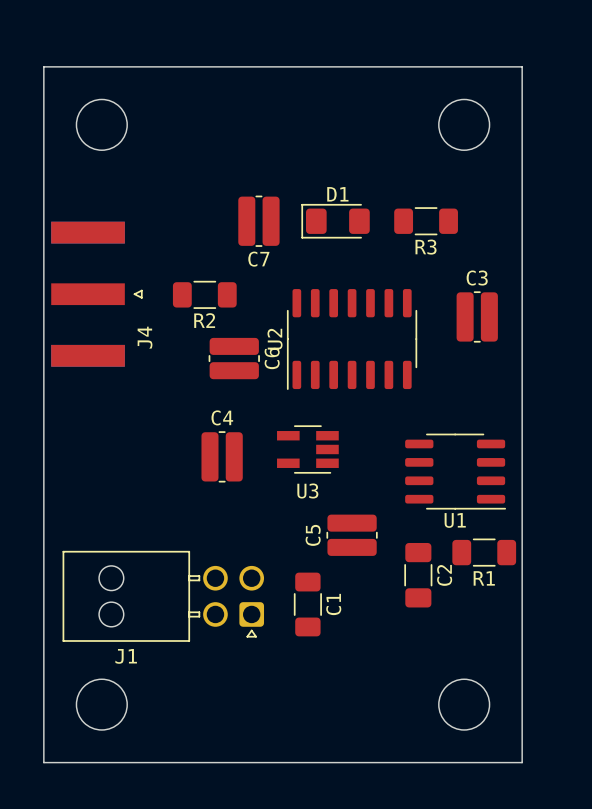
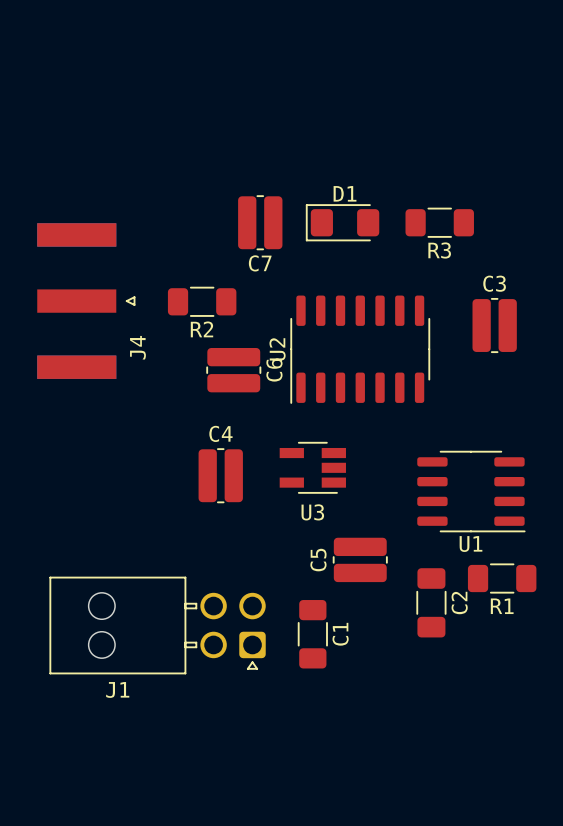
board edge: (43, 66) (522, 66) (522, 762) (43, 762) (43, 66) -> none
round board edge: [75, 98, 128, 151] -> none
round board edge: [438, 98, 491, 151] -> none
round board edge: [75, 678, 128, 731] -> none
round board edge: [438, 678, 491, 731] -> none

